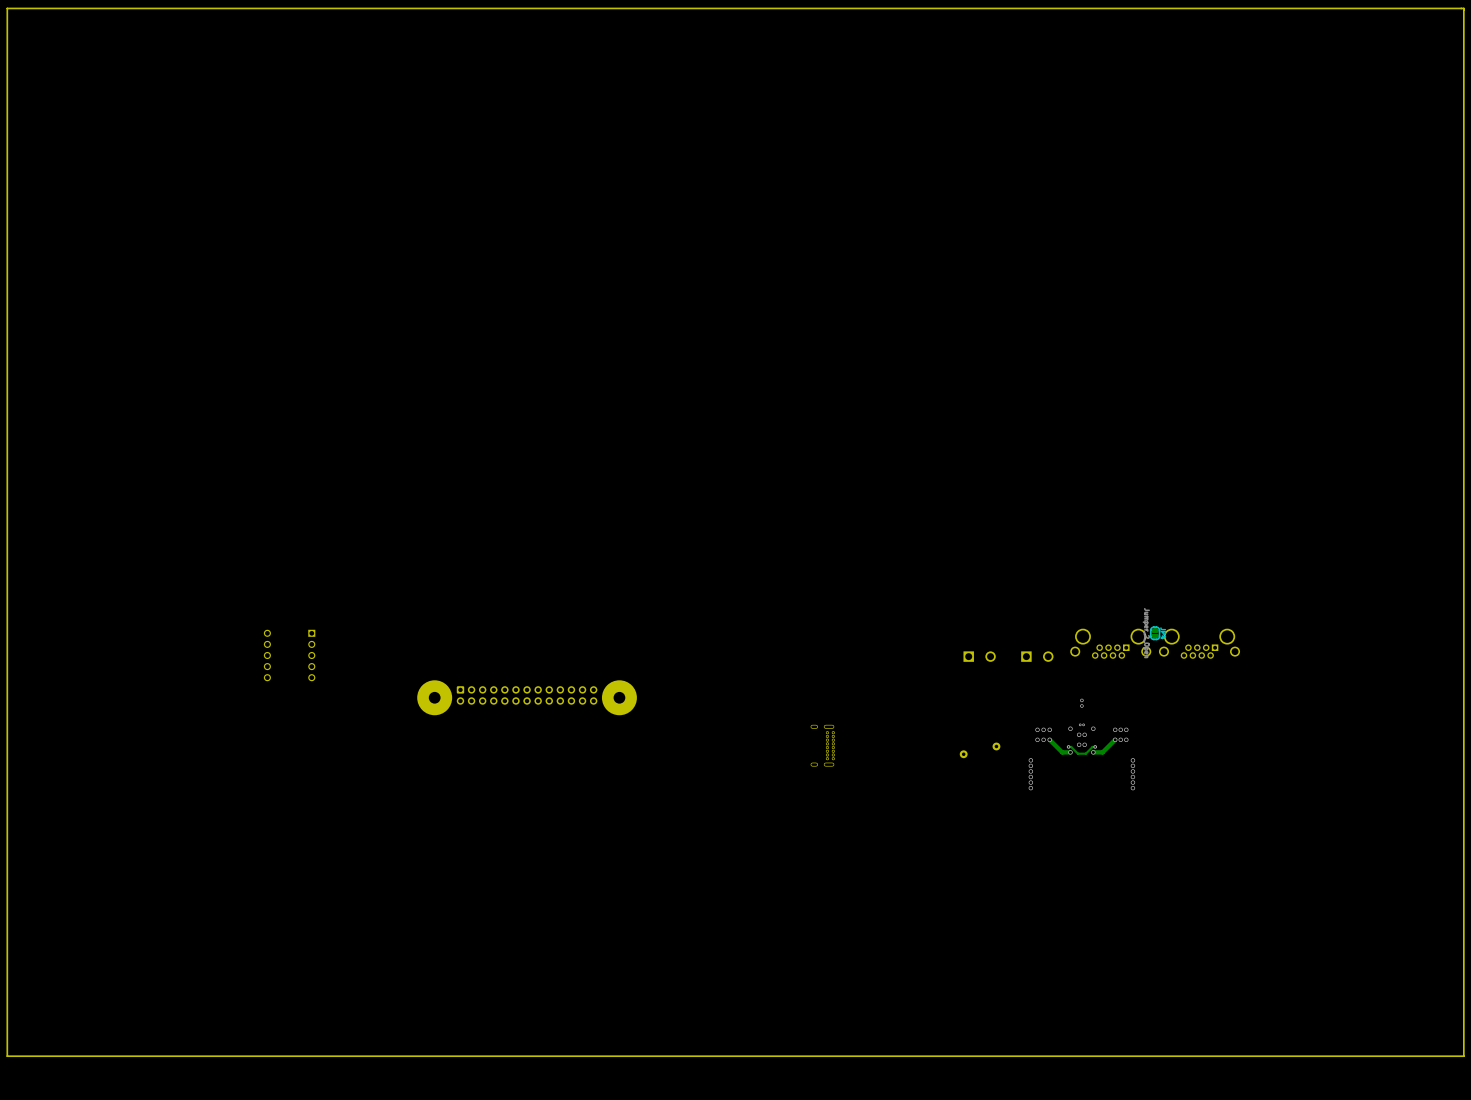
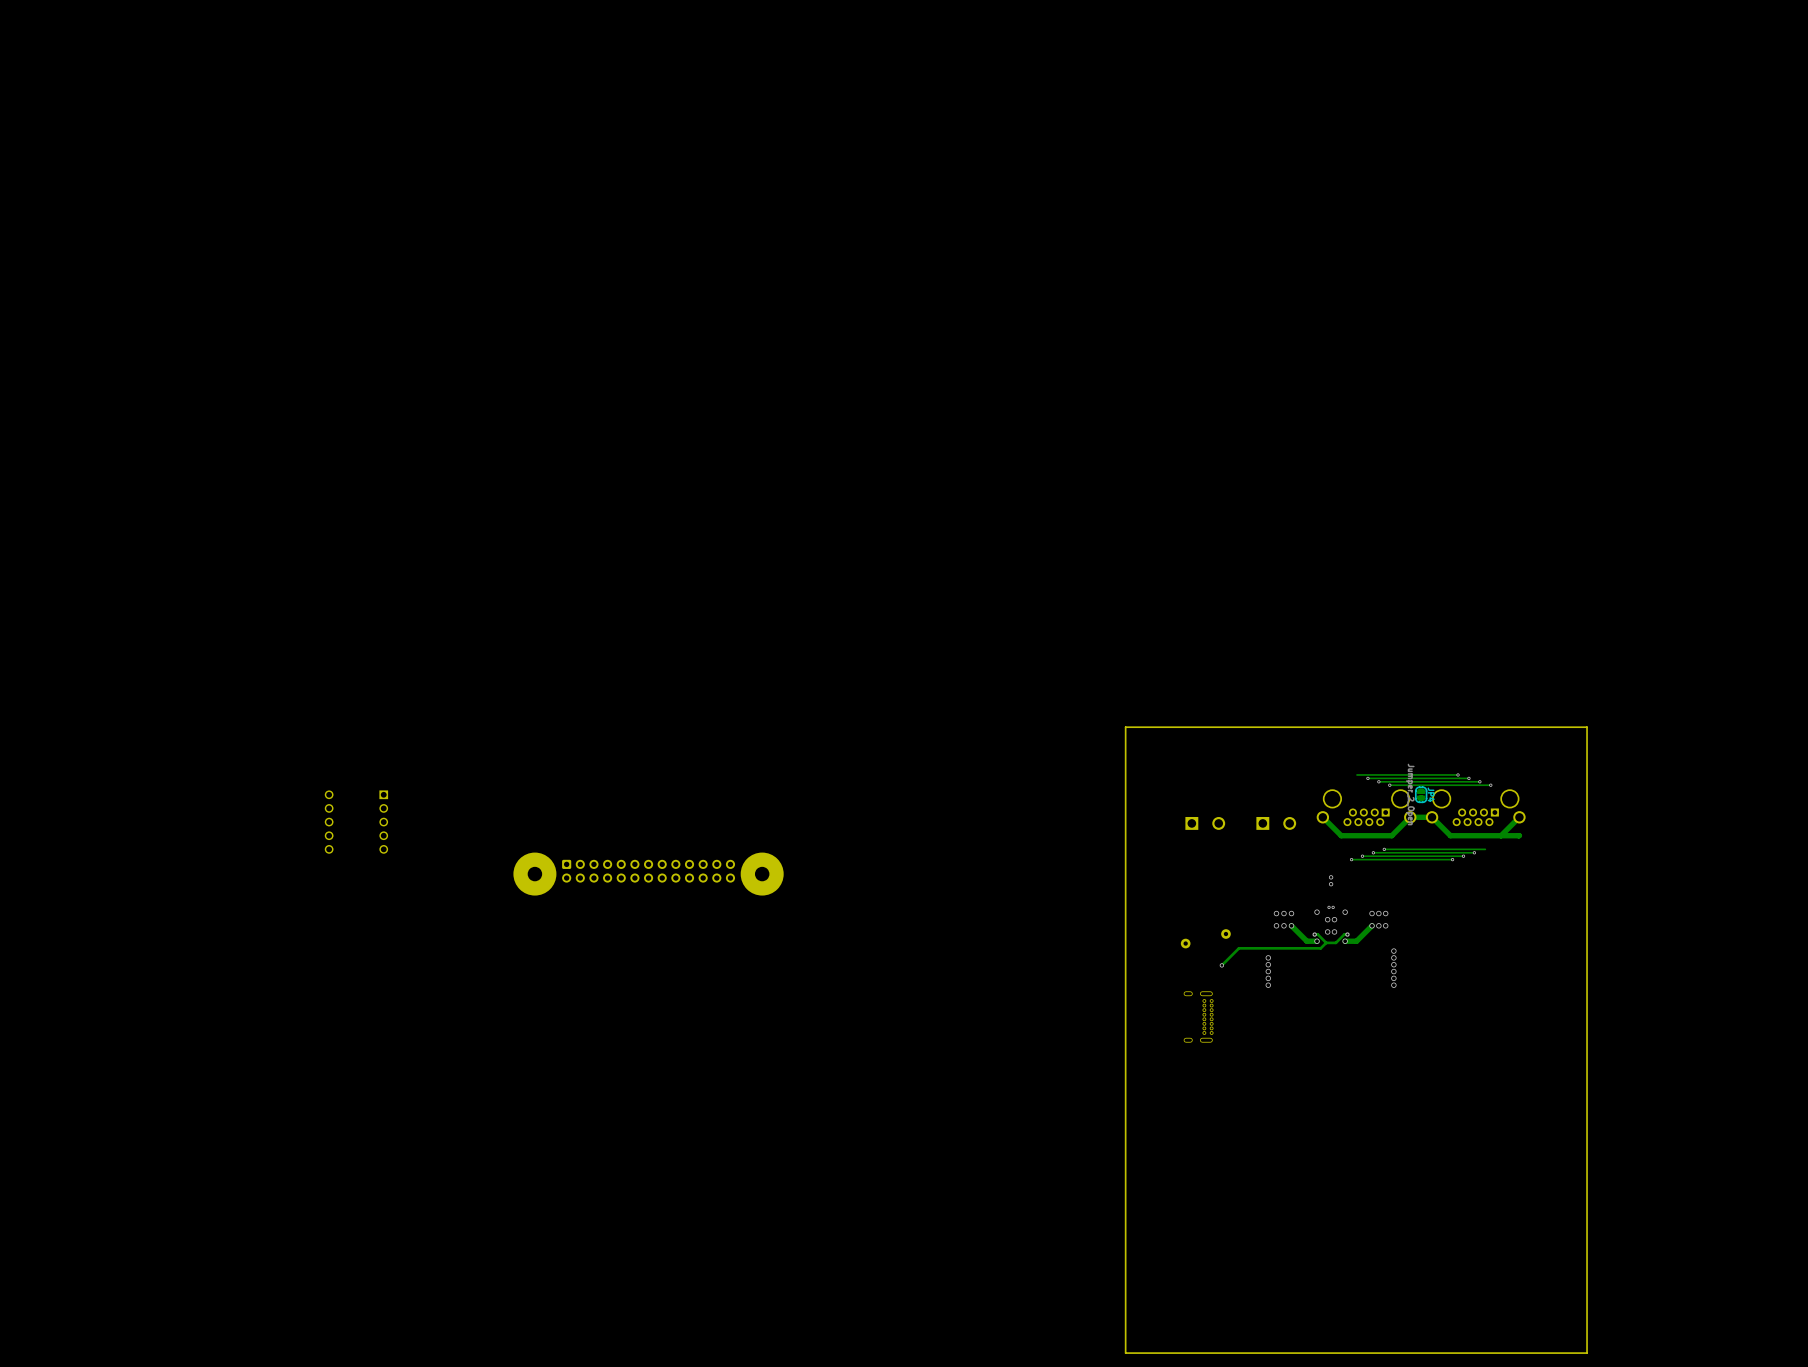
board edge: (1463, 8) (7, 8) (7, 1056) (1463, 1056) (1463, 8) -> none
board edge: none -> (1587, 727) (1125, 727) (1125, 1353) (1587, 1353) (1587, 727)
track: none -> (1458, 774) (1357, 774)
via: none -> (1458, 774)
via: none -> (1367, 778)
track: none -> (1468, 778) (1367, 778)
via: none -> (1468, 778)
via: none -> (1378, 781)
track: none -> (1479, 781) (1378, 781)
via: none -> (1479, 781)
via: none -> (1389, 785)
track: none -> (1490, 785) (1389, 785)
via: none -> (1490, 785)
track: none -> (1322, 817) (1341, 835) (1391, 835) (1410, 817) (1432, 817) (1450, 835) (1519, 835)
track: none -> (1519, 817) (1501, 835)
via: none -> (1384, 849)
track: none -> (1485, 849) (1384, 849)
via: none -> (1373, 852)
track: none -> (1474, 852) (1373, 852)
via: none -> (1474, 852)
via: none -> (1362, 856)
track: none -> (1463, 856) (1362, 856)
via: none -> (1463, 856)
via: none -> (1351, 859)
track: none -> (1452, 859) (1351, 859)
via: none -> (1452, 859)
part: (822, 745) -> none
track: none -> (1326, 942) (1320, 948) (1238, 948) (1221, 965)
via: (1030, 760) -> none
via: none -> (1221, 965)
part: none -> (1198, 1016)

